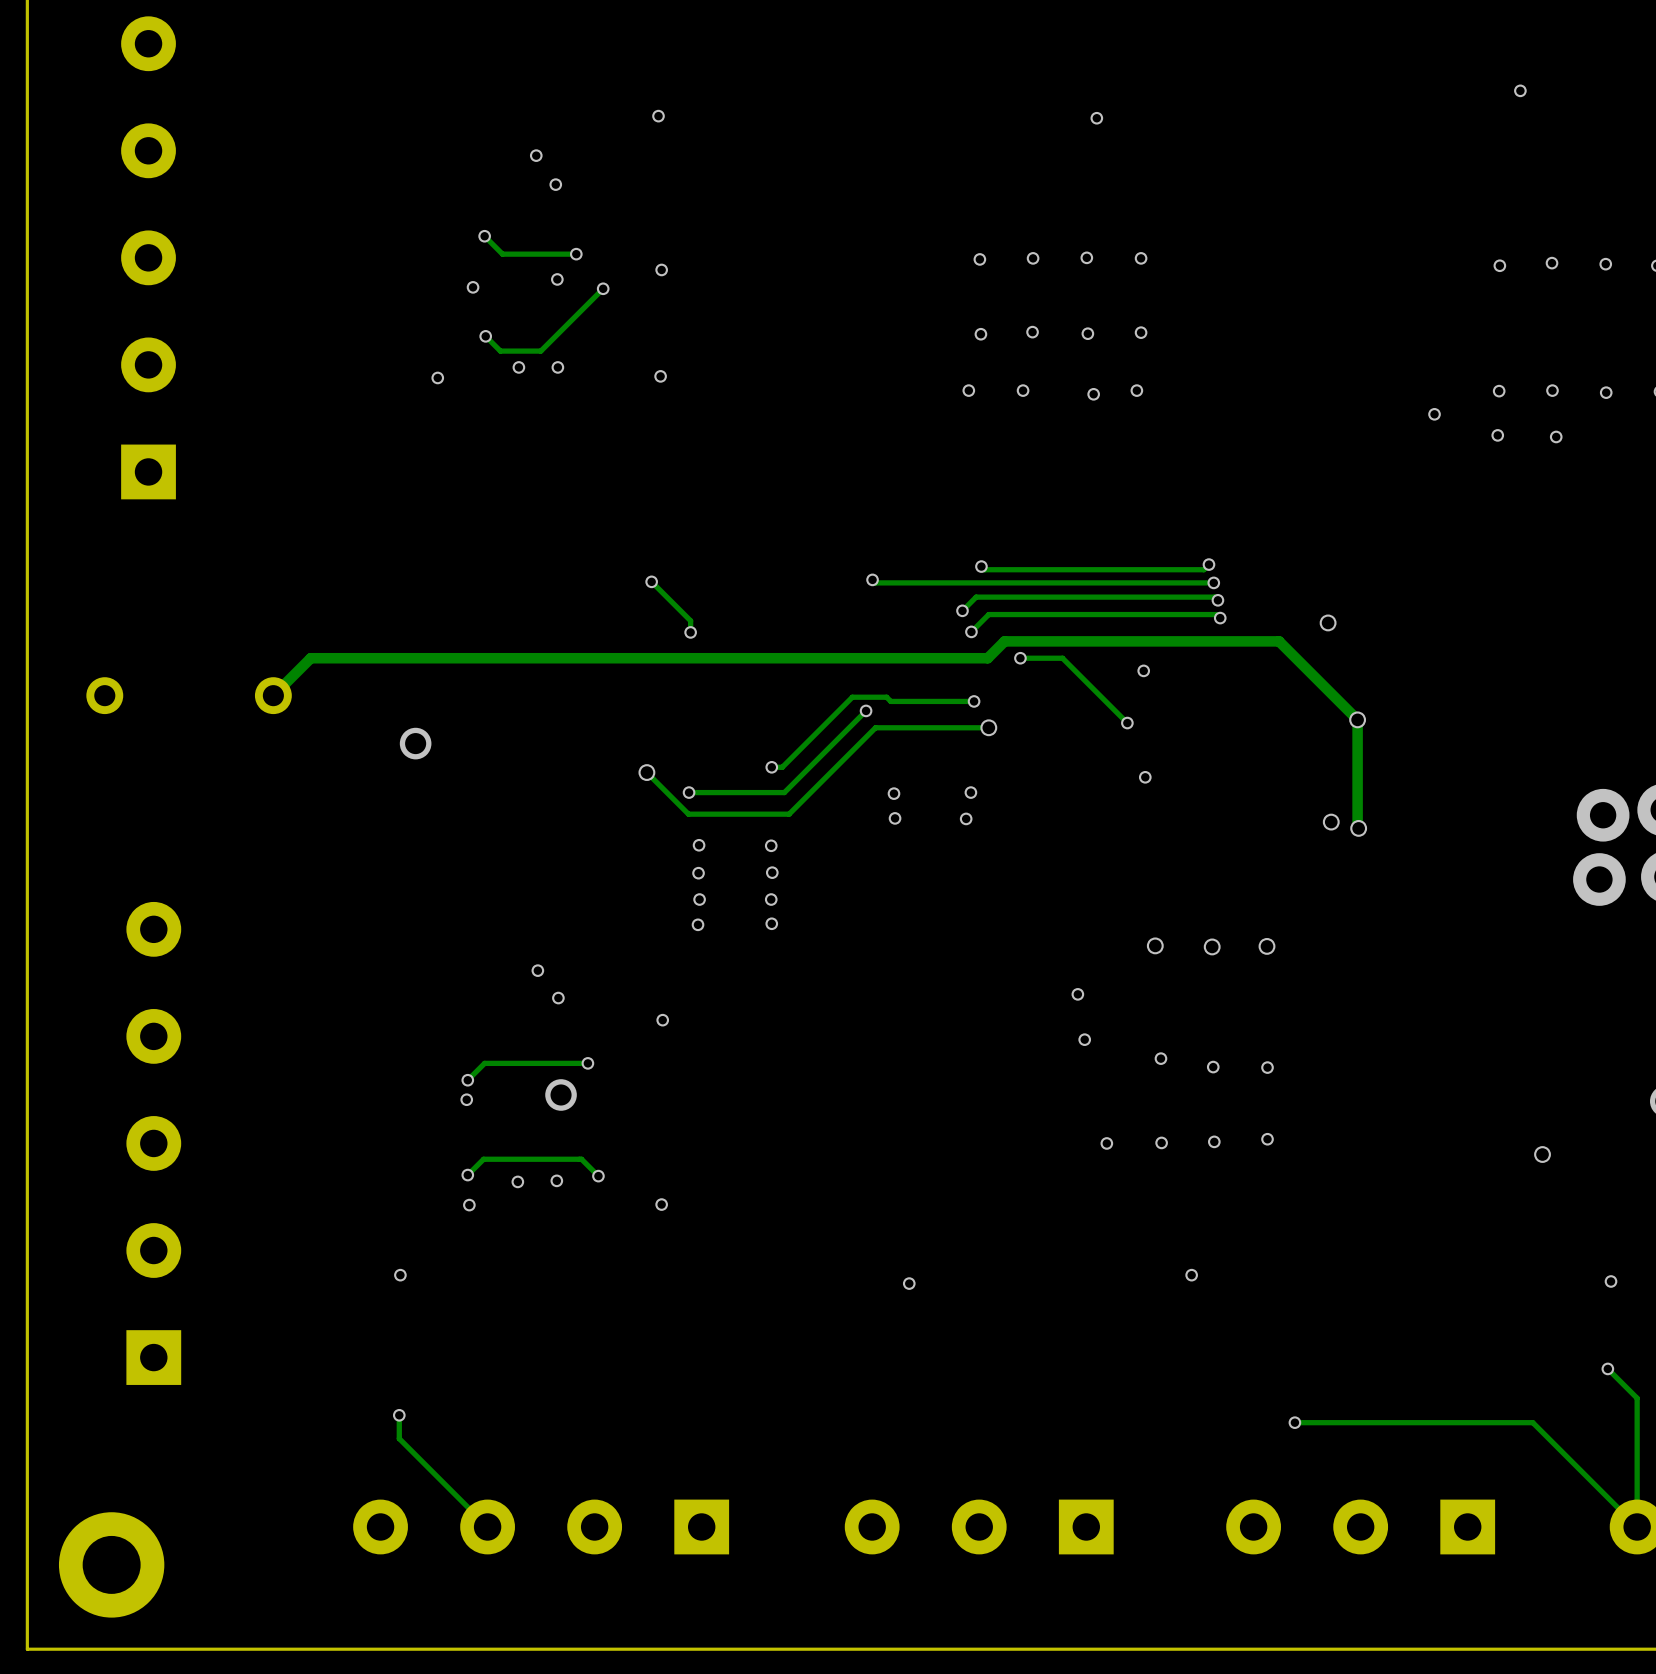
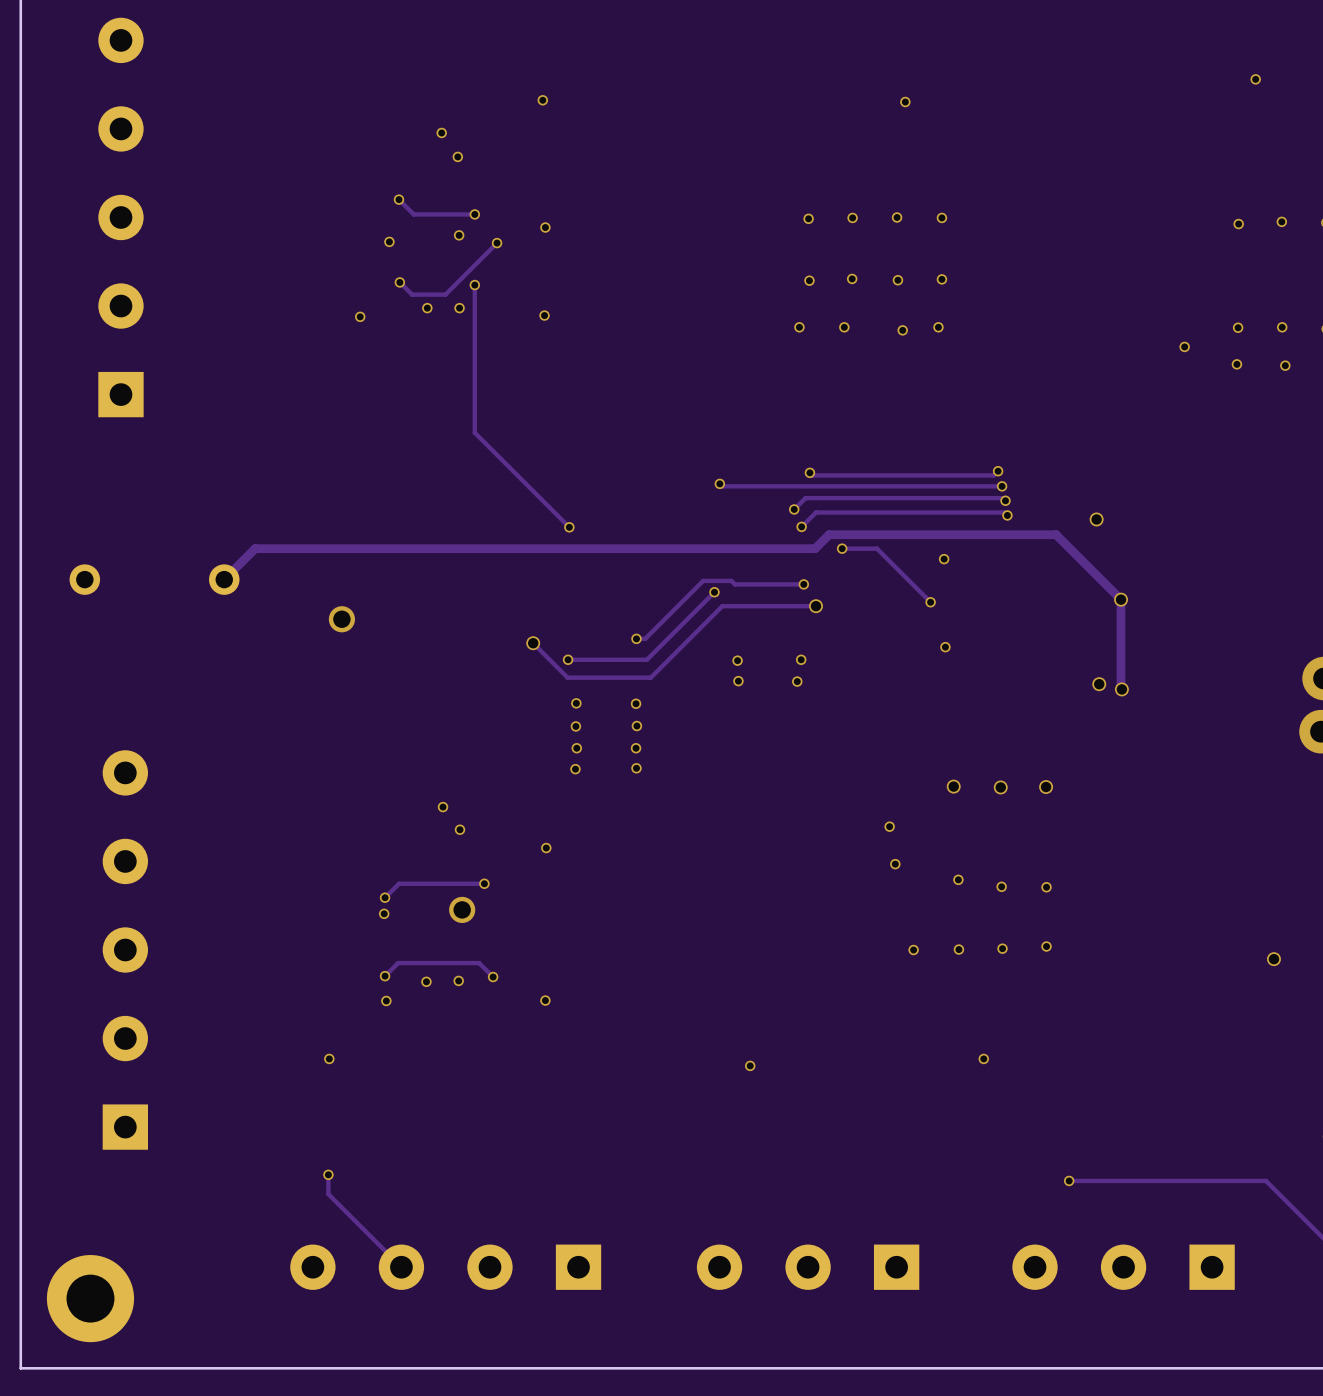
via: none -> (474, 285)
track: (651, 581) (690, 620) (690, 632) -> (474, 285) (474, 432) (569, 527)
via: (651, 581) -> none

